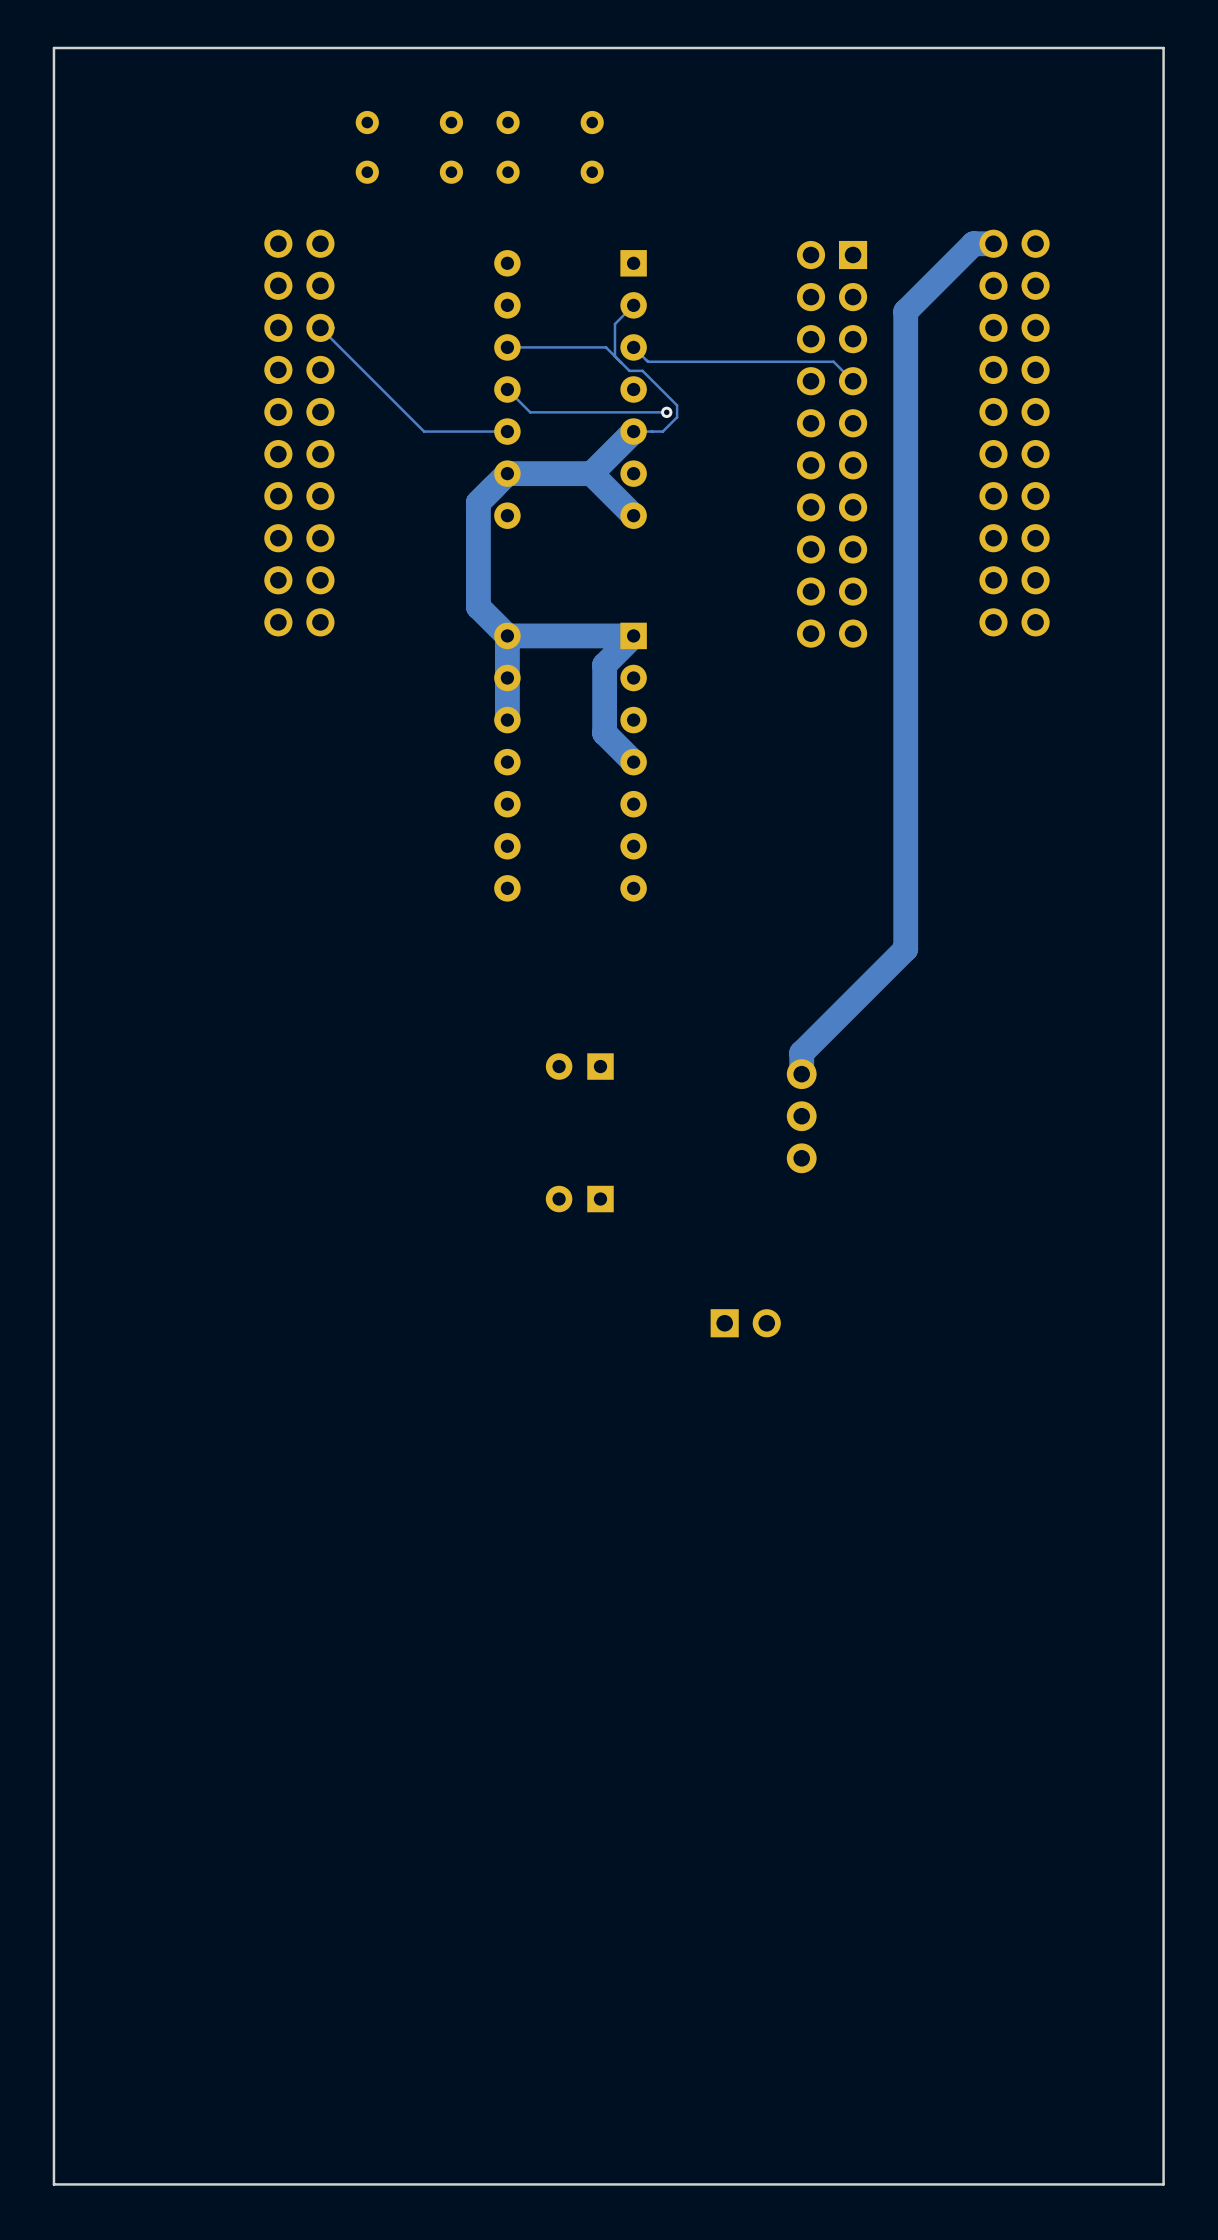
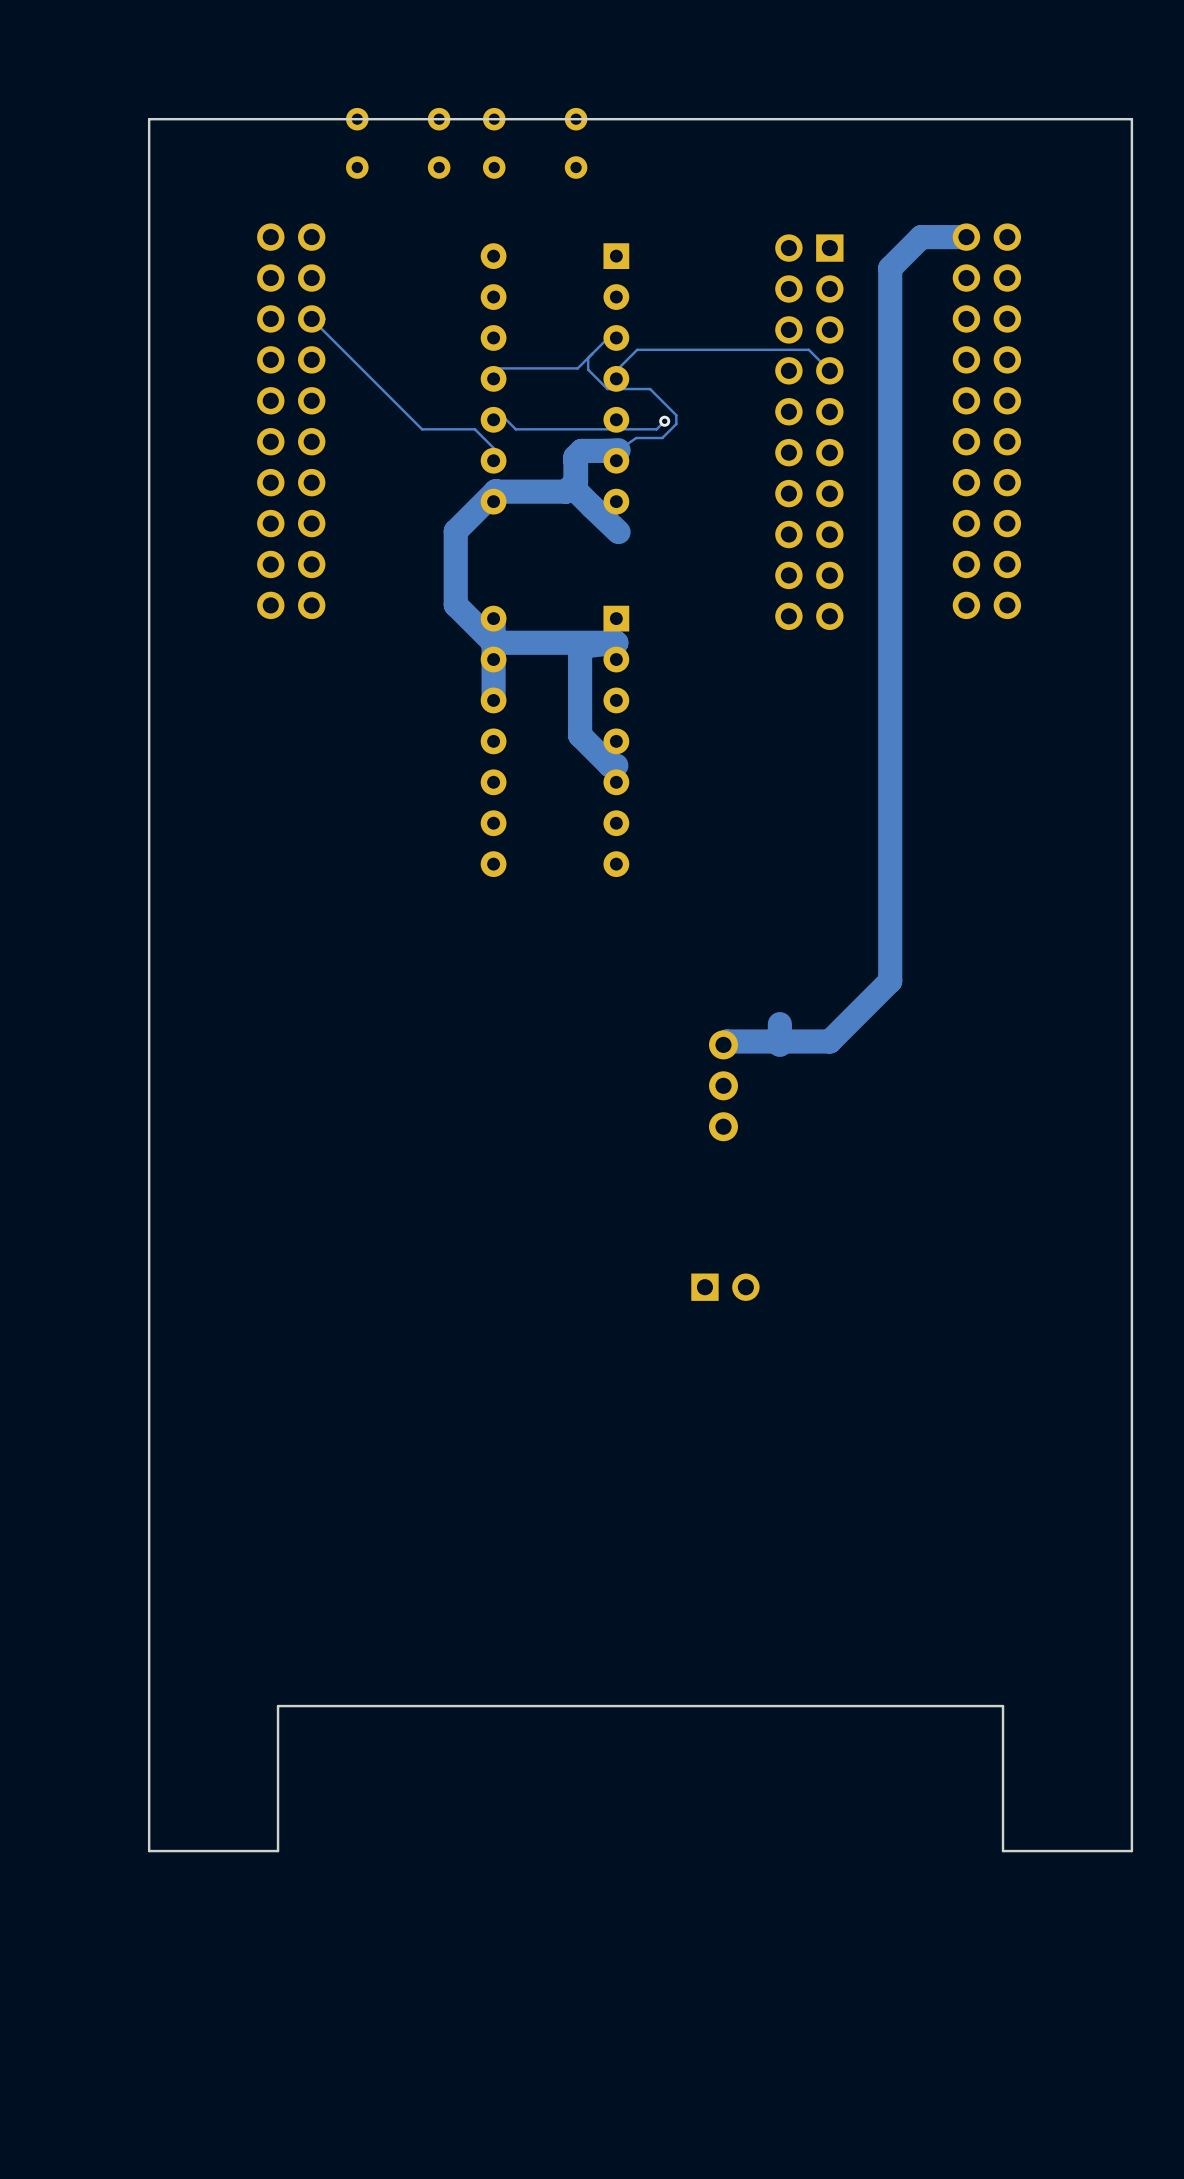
board edge: (1163, 122) (1163, 47) (53, 47) (53, 2184) (1163, 2184) (1163, 1902) -> (1131, 119) (149, 119) (149, 1851) (278, 1851) (278, 1706) (1003, 1706) (1003, 1851) (1131, 1851)
track: (973, 243) (905, 311) (905, 949) (801, 1053) -> (947, 237) (921, 237) (890, 268) (890, 981) (829, 1041) (726, 1041) (723, 1044)
track: (633, 305) (614, 323) (614, 356) -> none
track: none -> (608, 331) (618, 327) (577, 368) (495, 368)
track: (507, 347) (606, 347) (629, 370) (642, 370) (677, 405) (677, 417) (662, 431) (633, 431) (591, 473) (507, 473) -> none
track: (633, 347) (647, 361) (833, 361) -> (618, 368) (637, 349) (808, 349) (810, 351)
track: none -> (588, 357) (588, 369) (607, 389) (650, 389) (676, 415) (676, 424) (662, 438) (636, 438) (618, 450) (581, 450) (575, 457) (575, 490) (618, 532)
track: (507, 389) (530, 412) (666, 412) -> none
via position: (666, 412) -> (664, 421)
track: none -> (495, 409) (515, 429) (656, 429) (664, 421)
track: (507, 431) (424, 431) -> (495, 450) (474, 429) (422, 429) (412, 419)
track: (507, 473) (478, 502) (478, 606) (507, 635) (633, 635) (604, 664) (604, 733) (633, 762) -> none
track: (592, 474) (633, 515) -> (576, 461) (576, 481) (566, 491) (495, 491) (455, 531) (455, 604) (493, 642) (616, 642) (580, 646) (580, 735) (610, 765) (616, 765)
part: (579, 1066) -> none
part position: (801, 1116) -> (723, 1085)
part: (579, 1199) -> none

